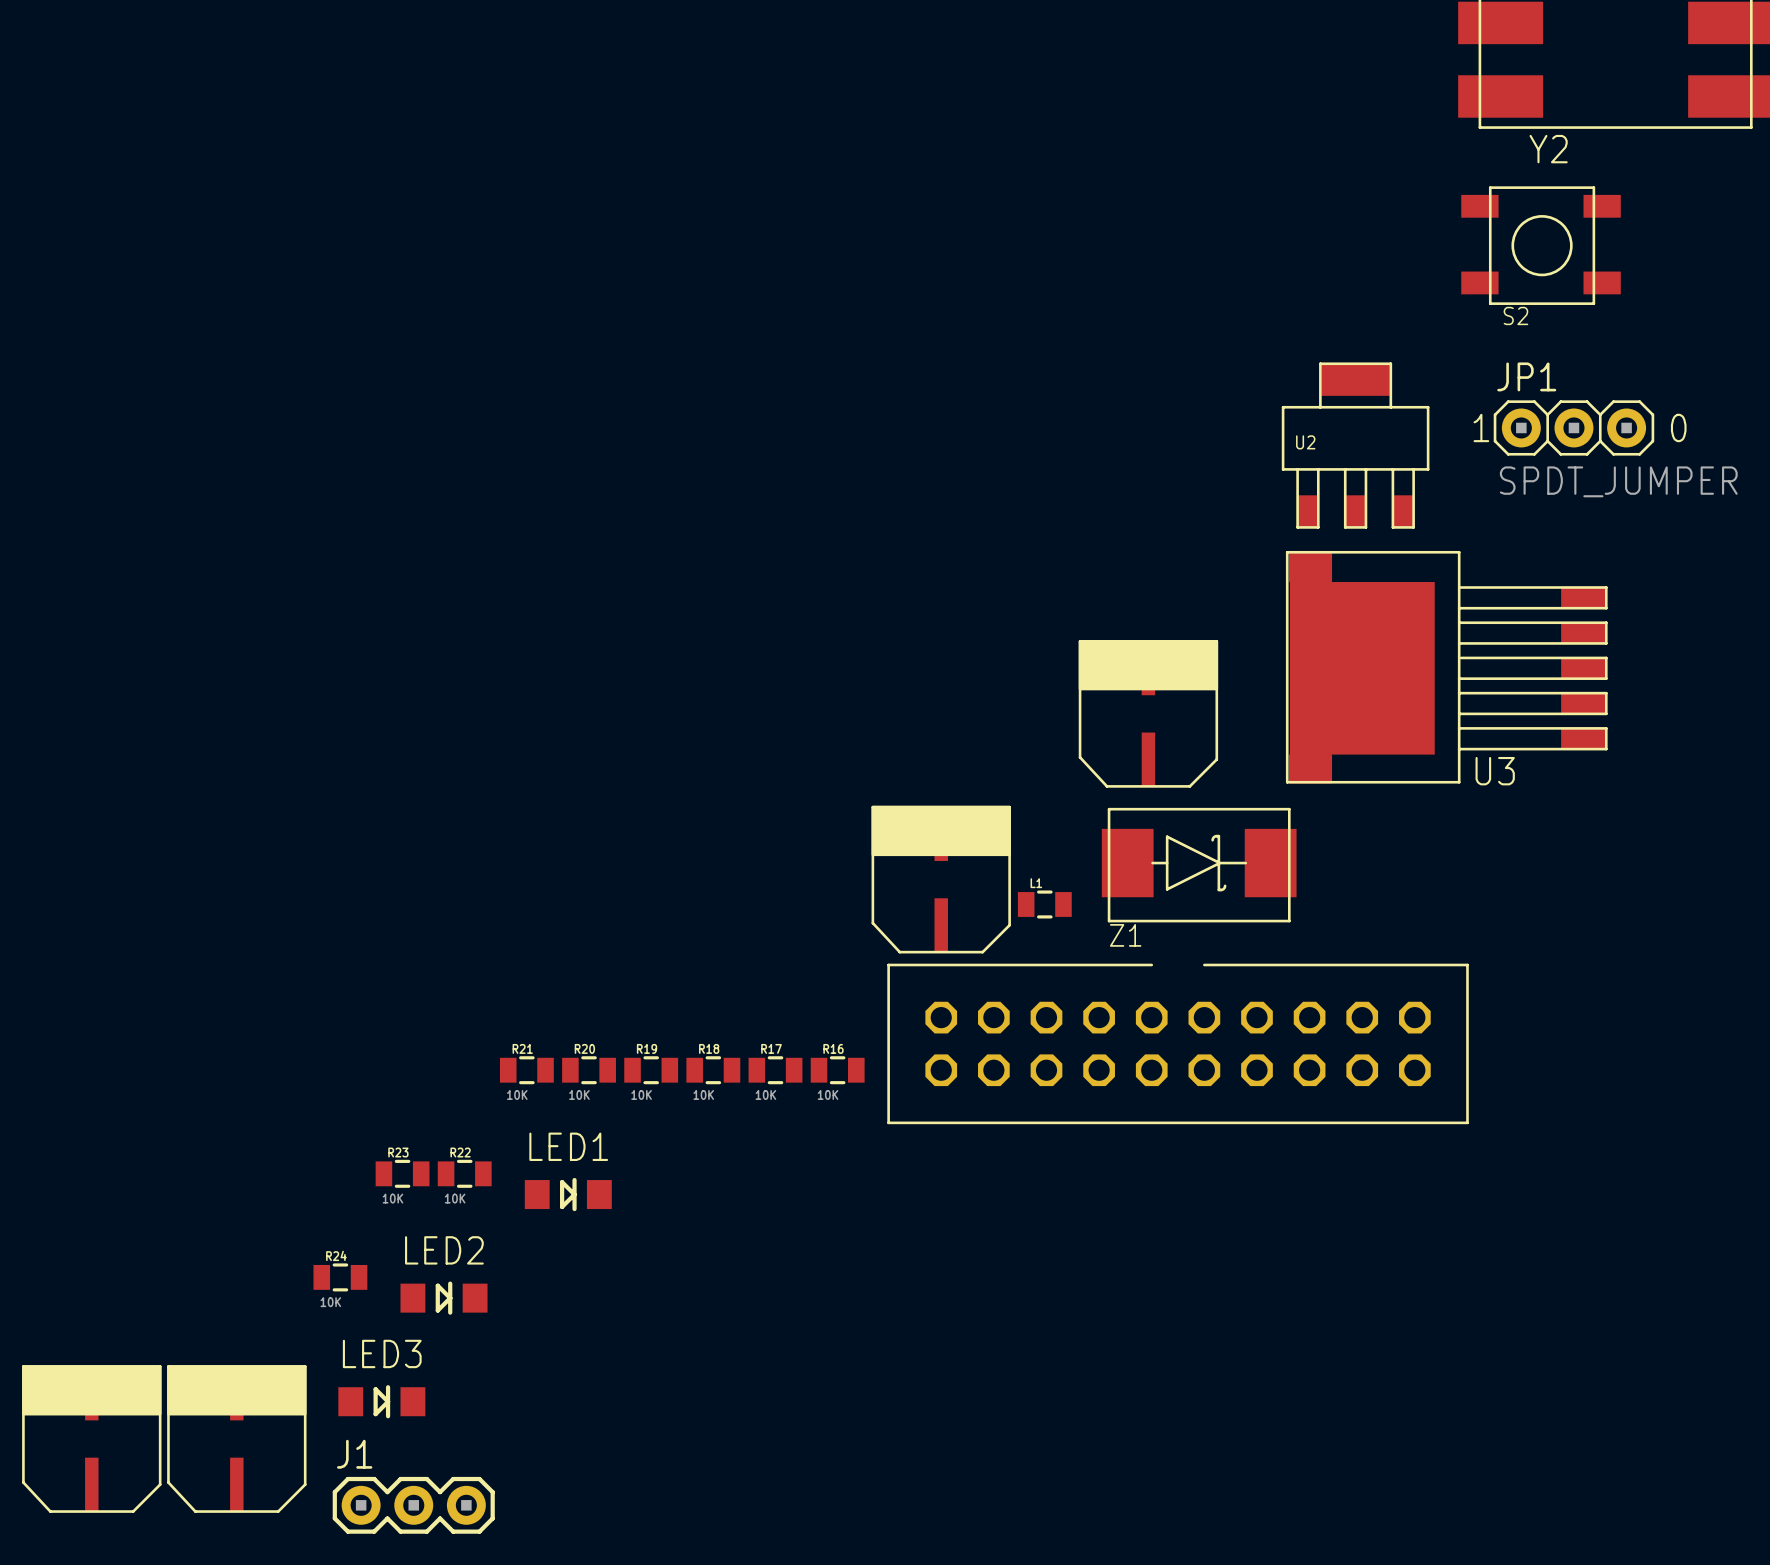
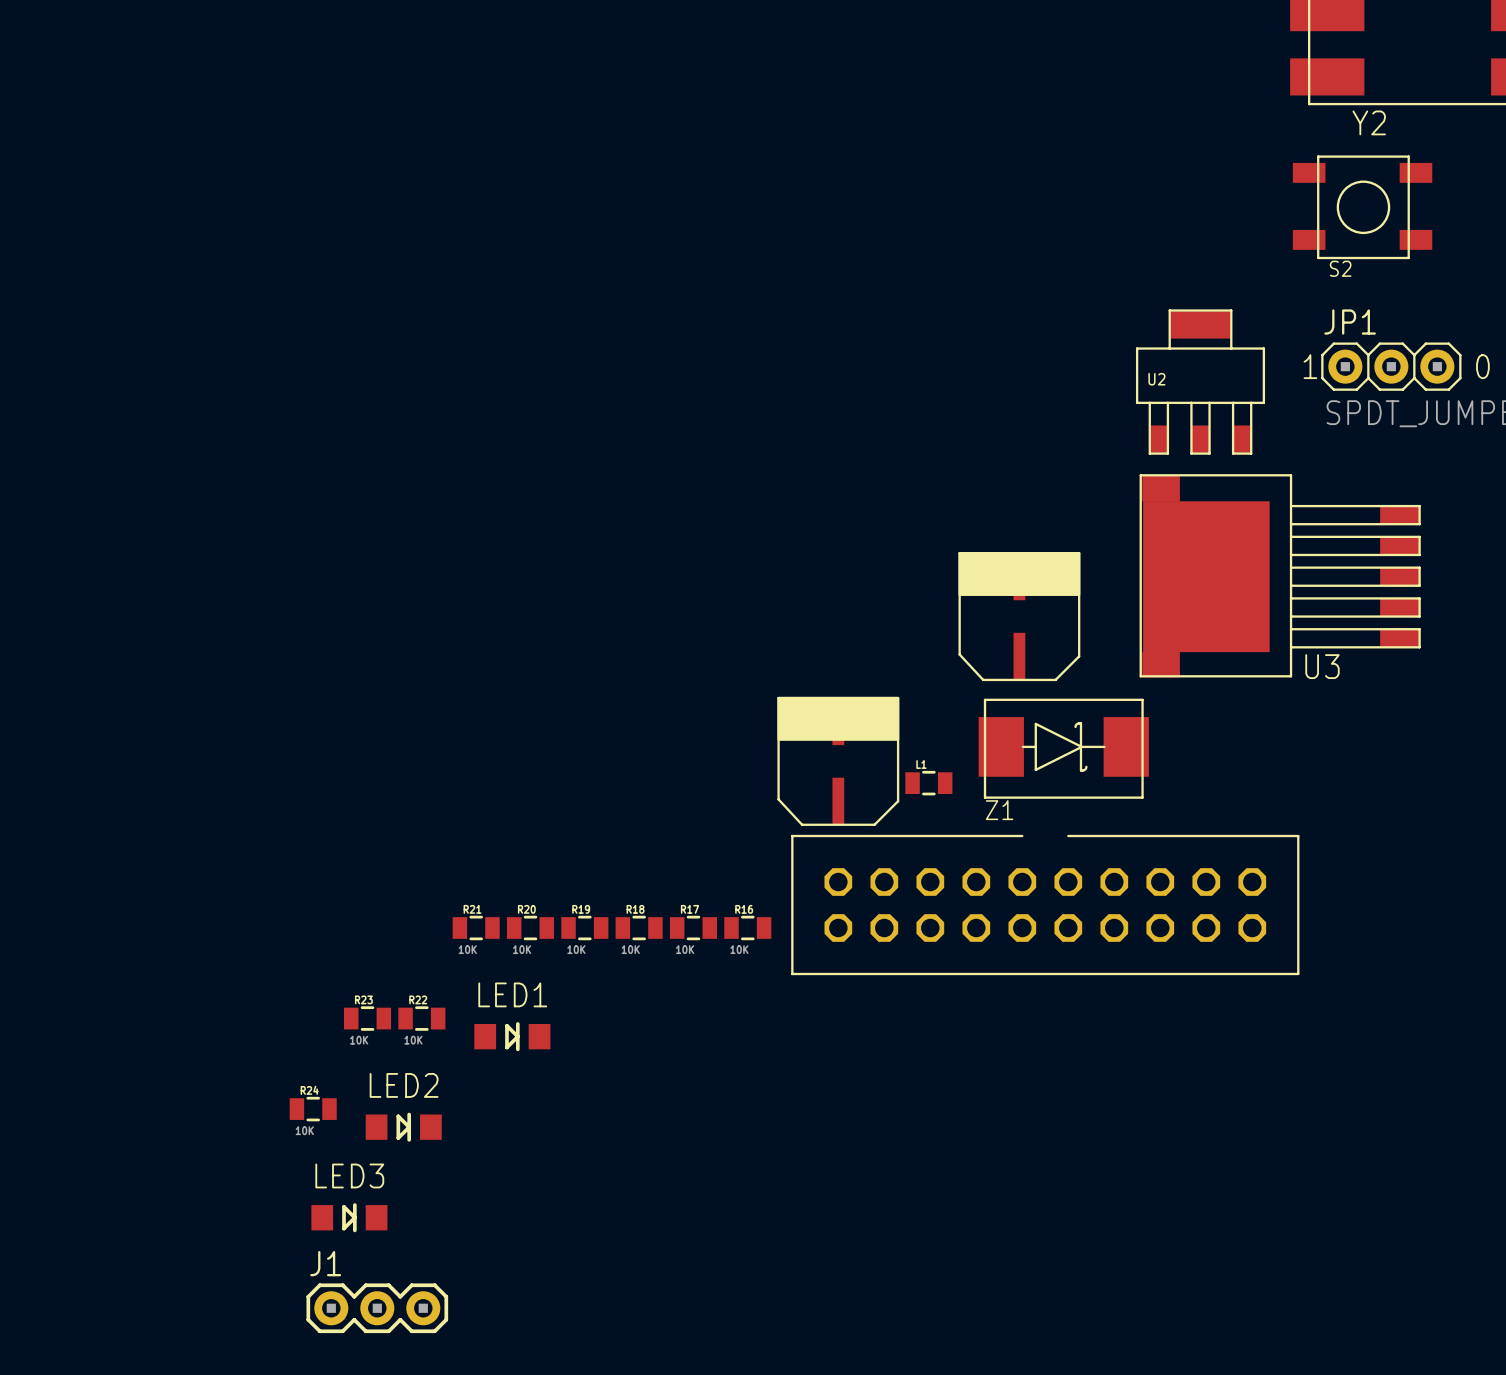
part: (91, 1439) -> none
part: (236, 1439) -> none

